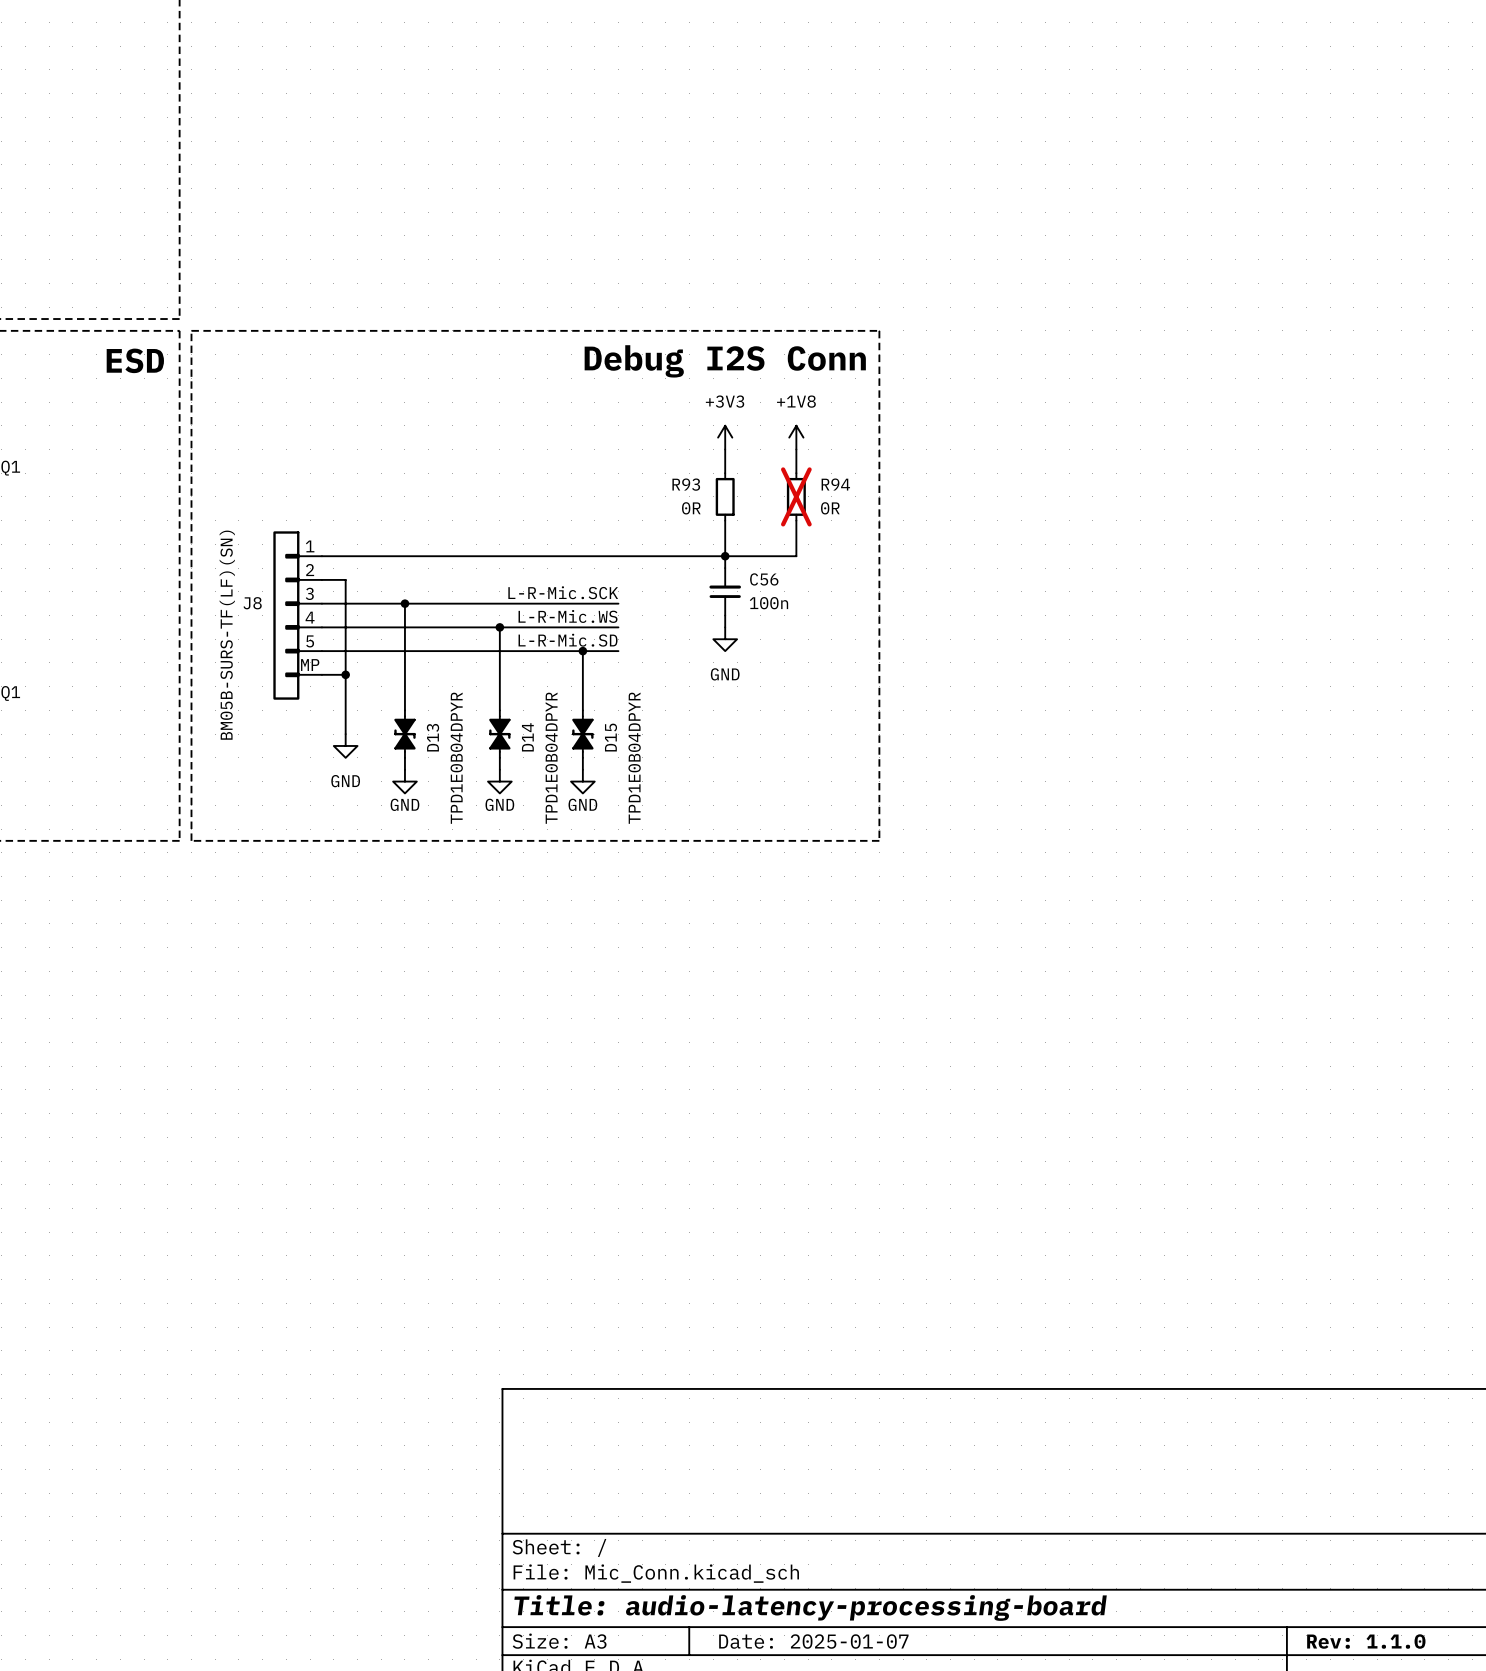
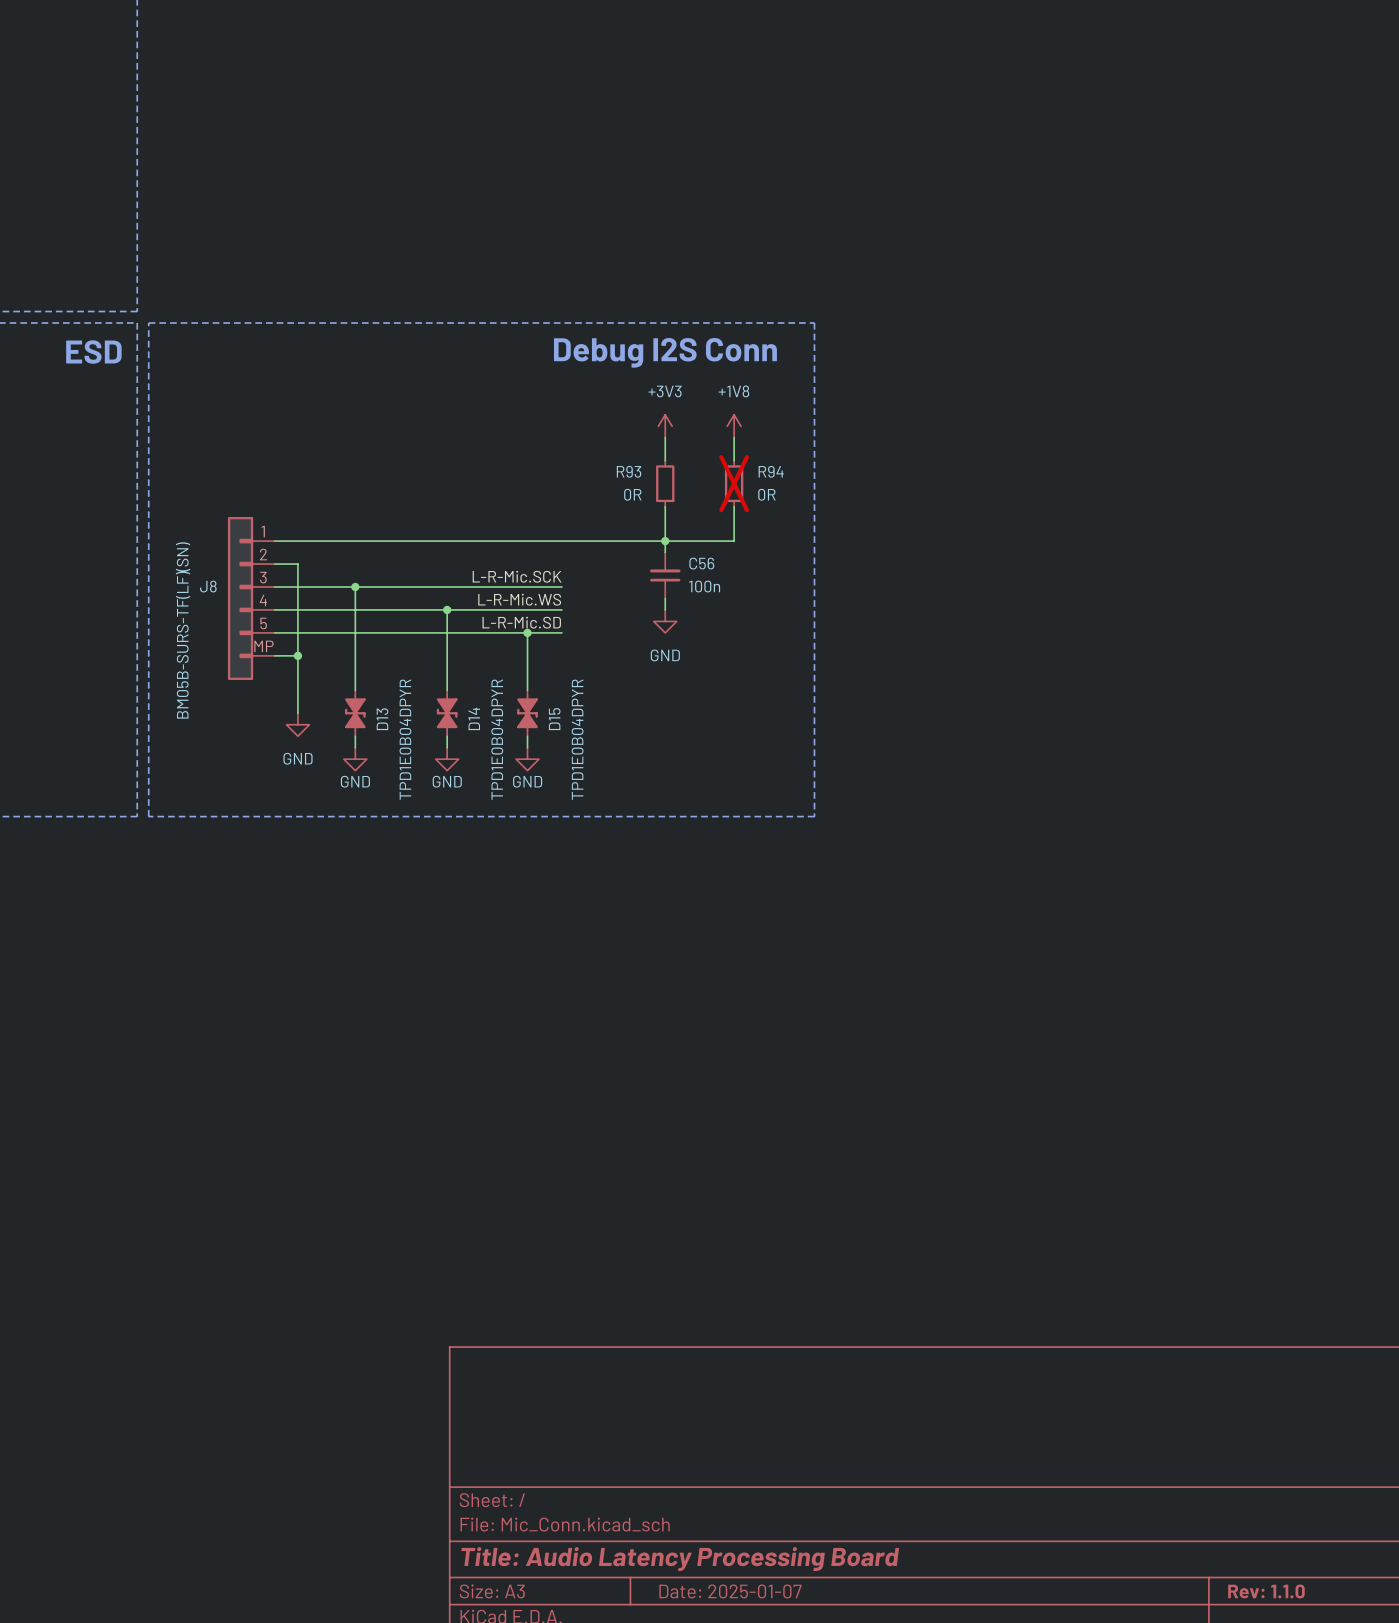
title block: Title: audio-latency-processing-board (810, 1607) -> Title: Audio Latency Processing Board (680, 1559)

